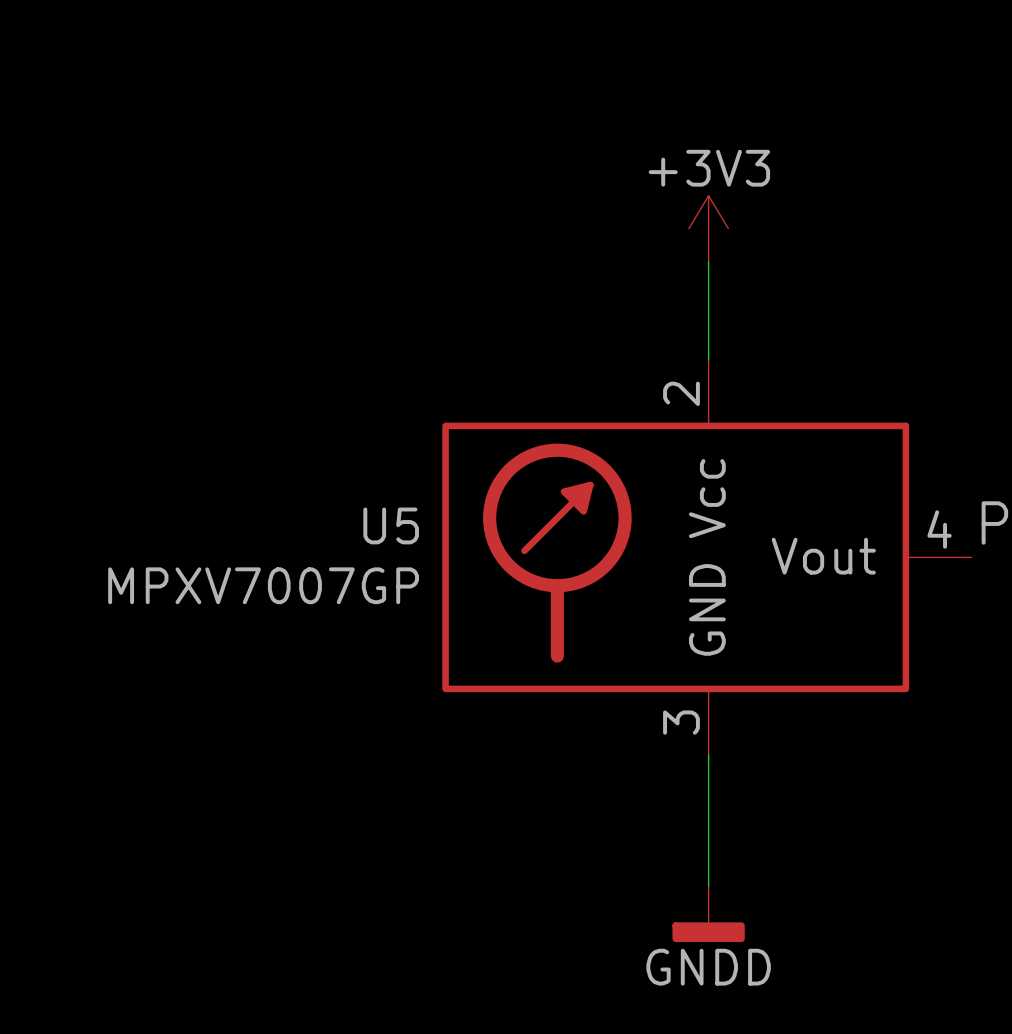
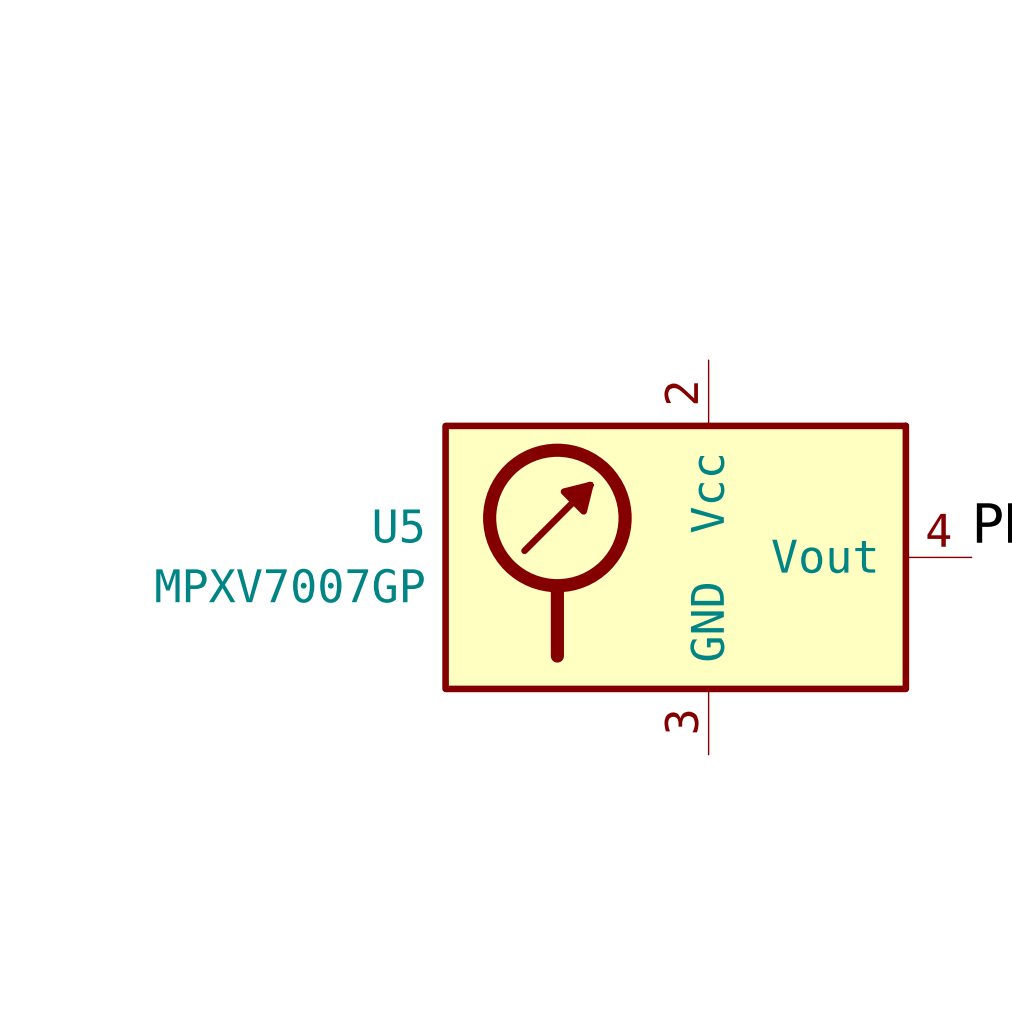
power symbol: +3V3 (708, 228) -> none
wire: (708, 261) (708, 360) -> none
wire: (708, 754) (708, 886) -> none
power symbol: GNDD (708, 914) -> none

